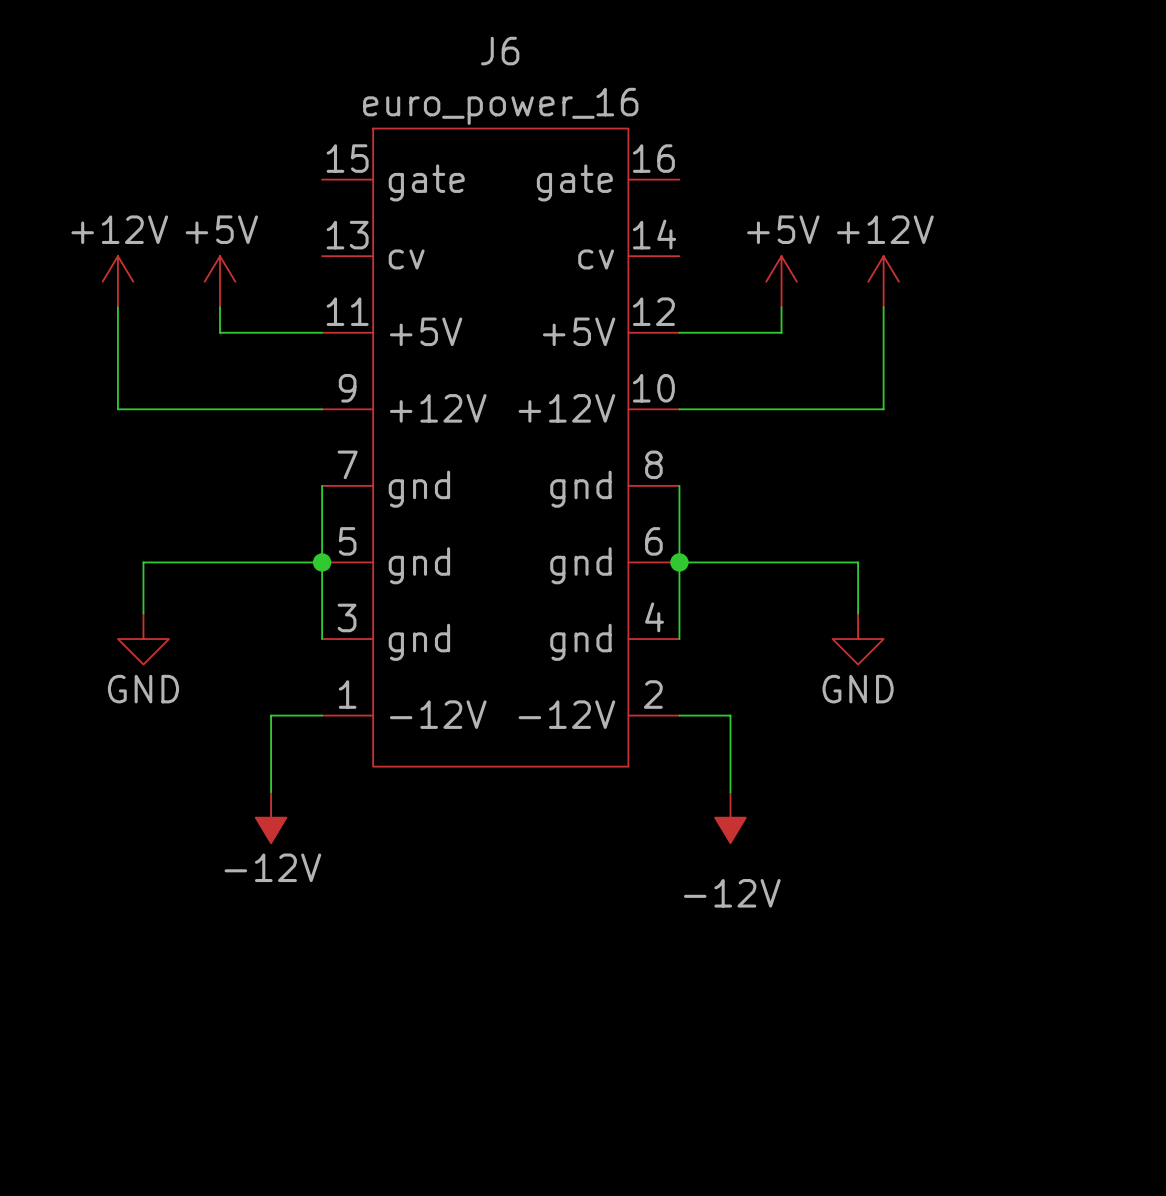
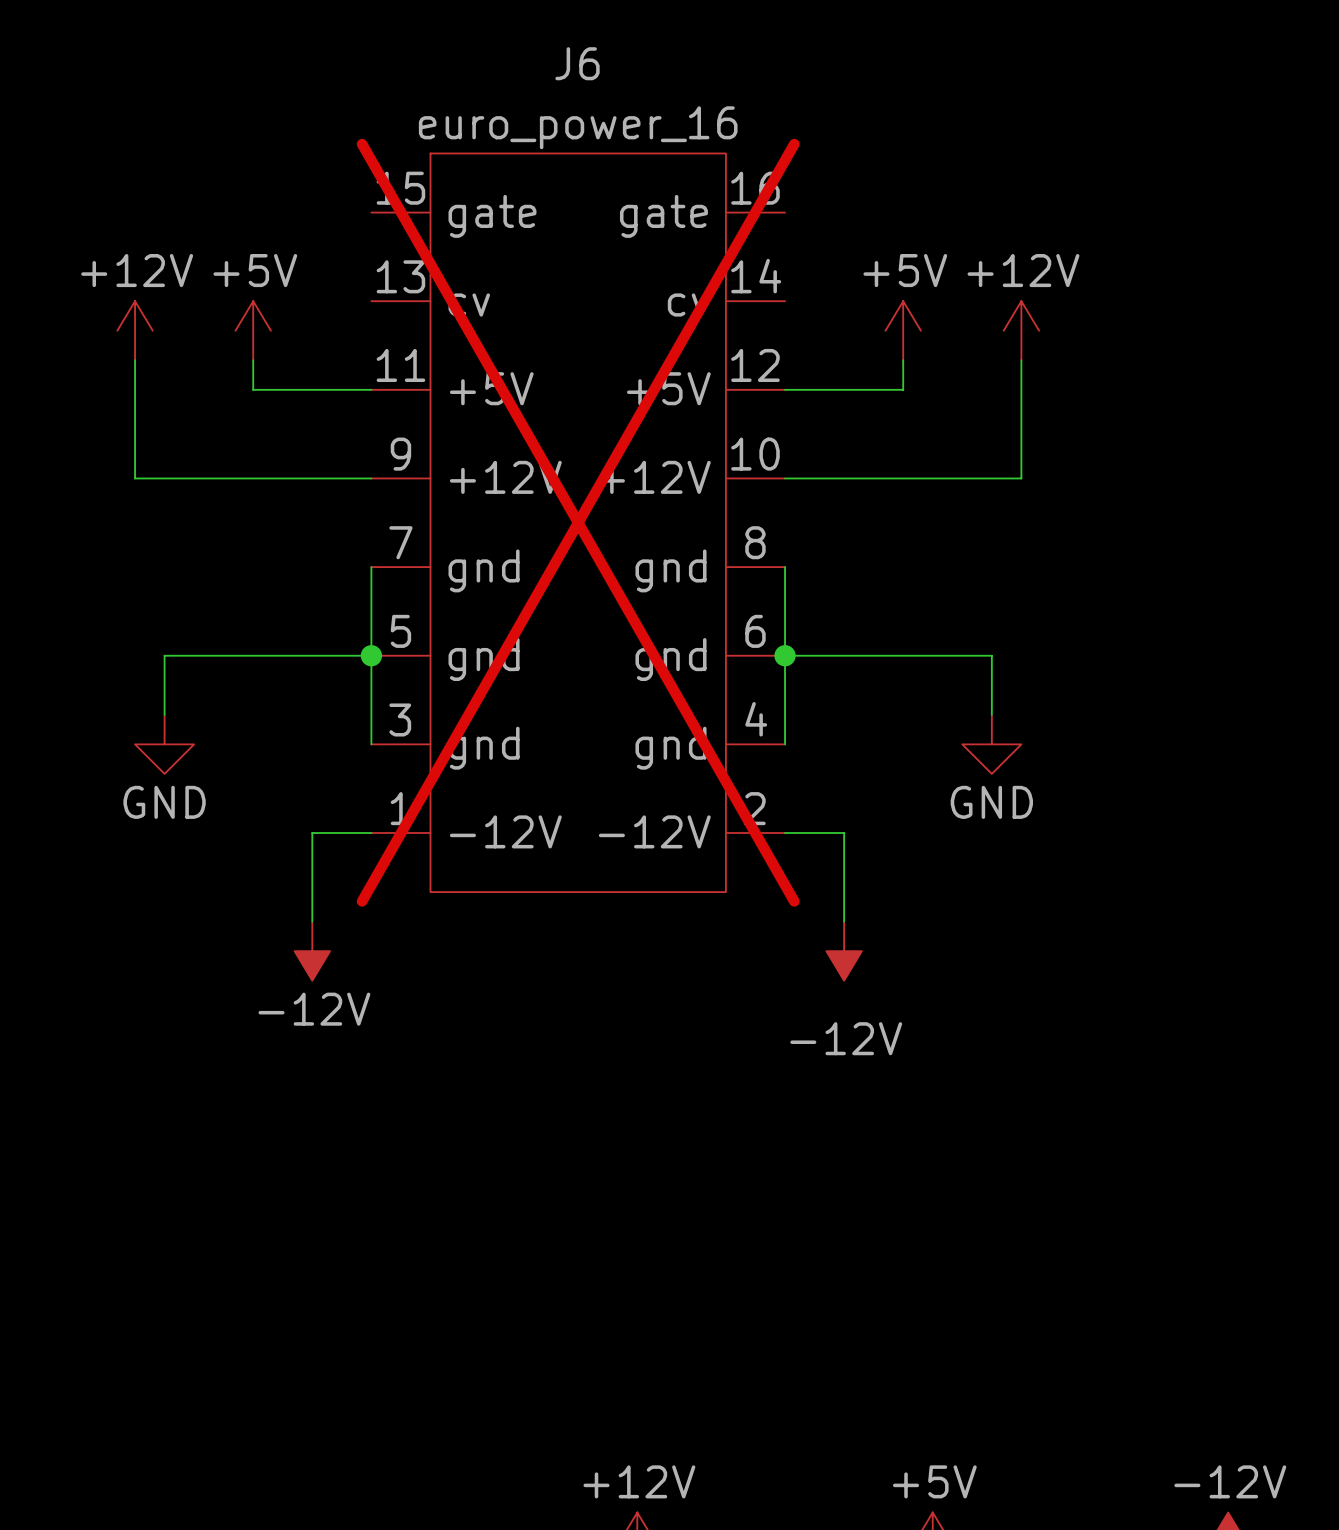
J6 do-not-place cross: none -> (578, 522)

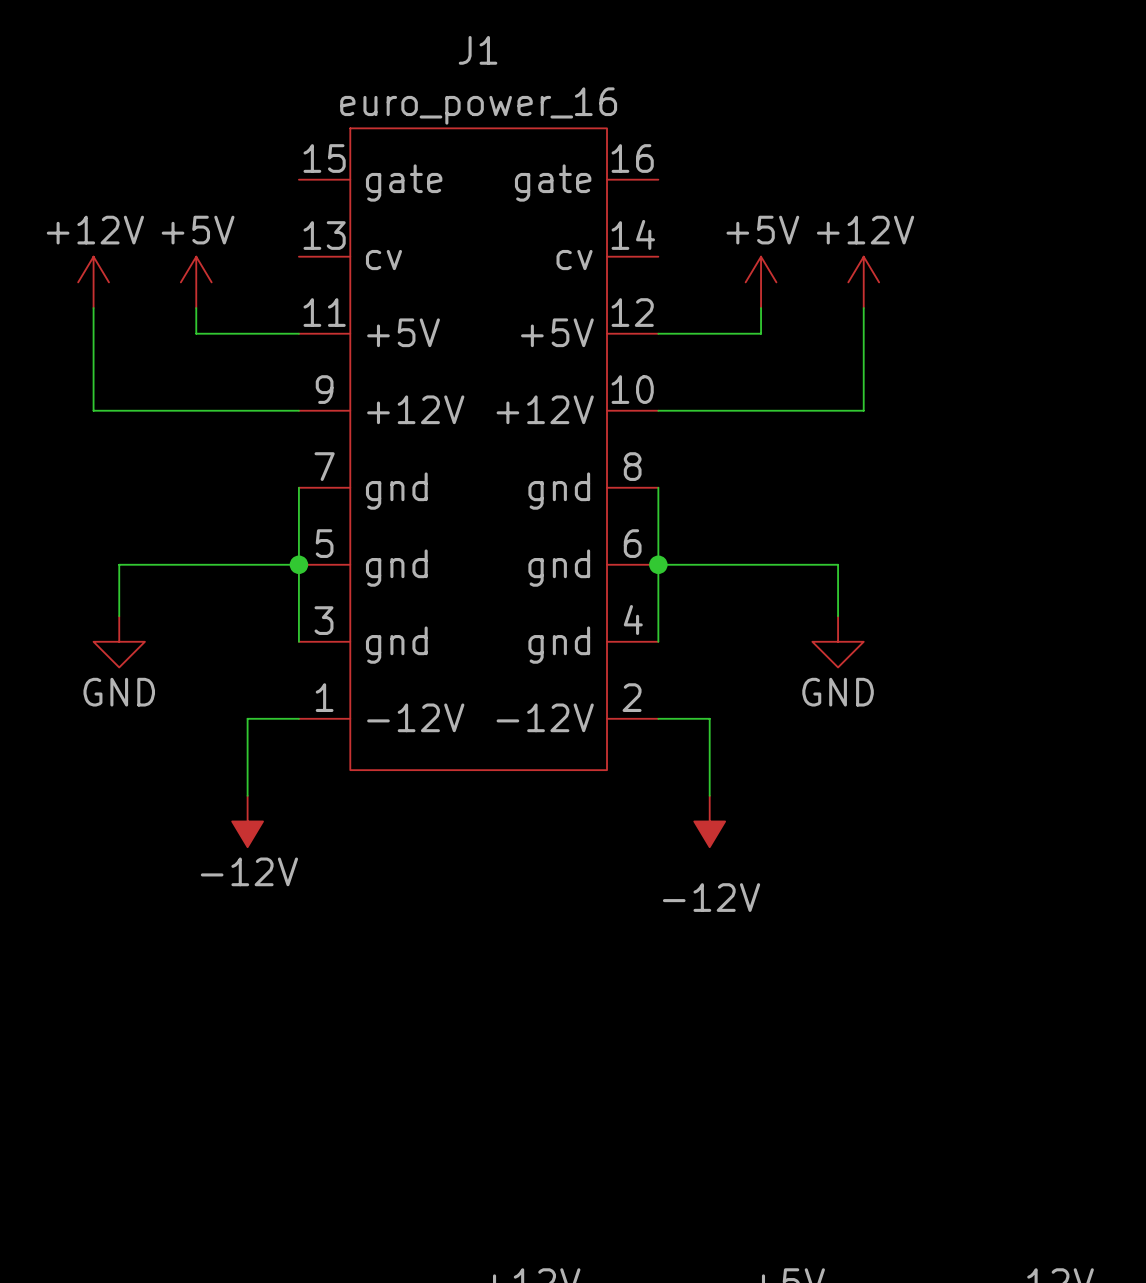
J6 name: J6 (577, 63) -> J1 (478, 50)
J6 do-not-place cross: (578, 522) -> none

